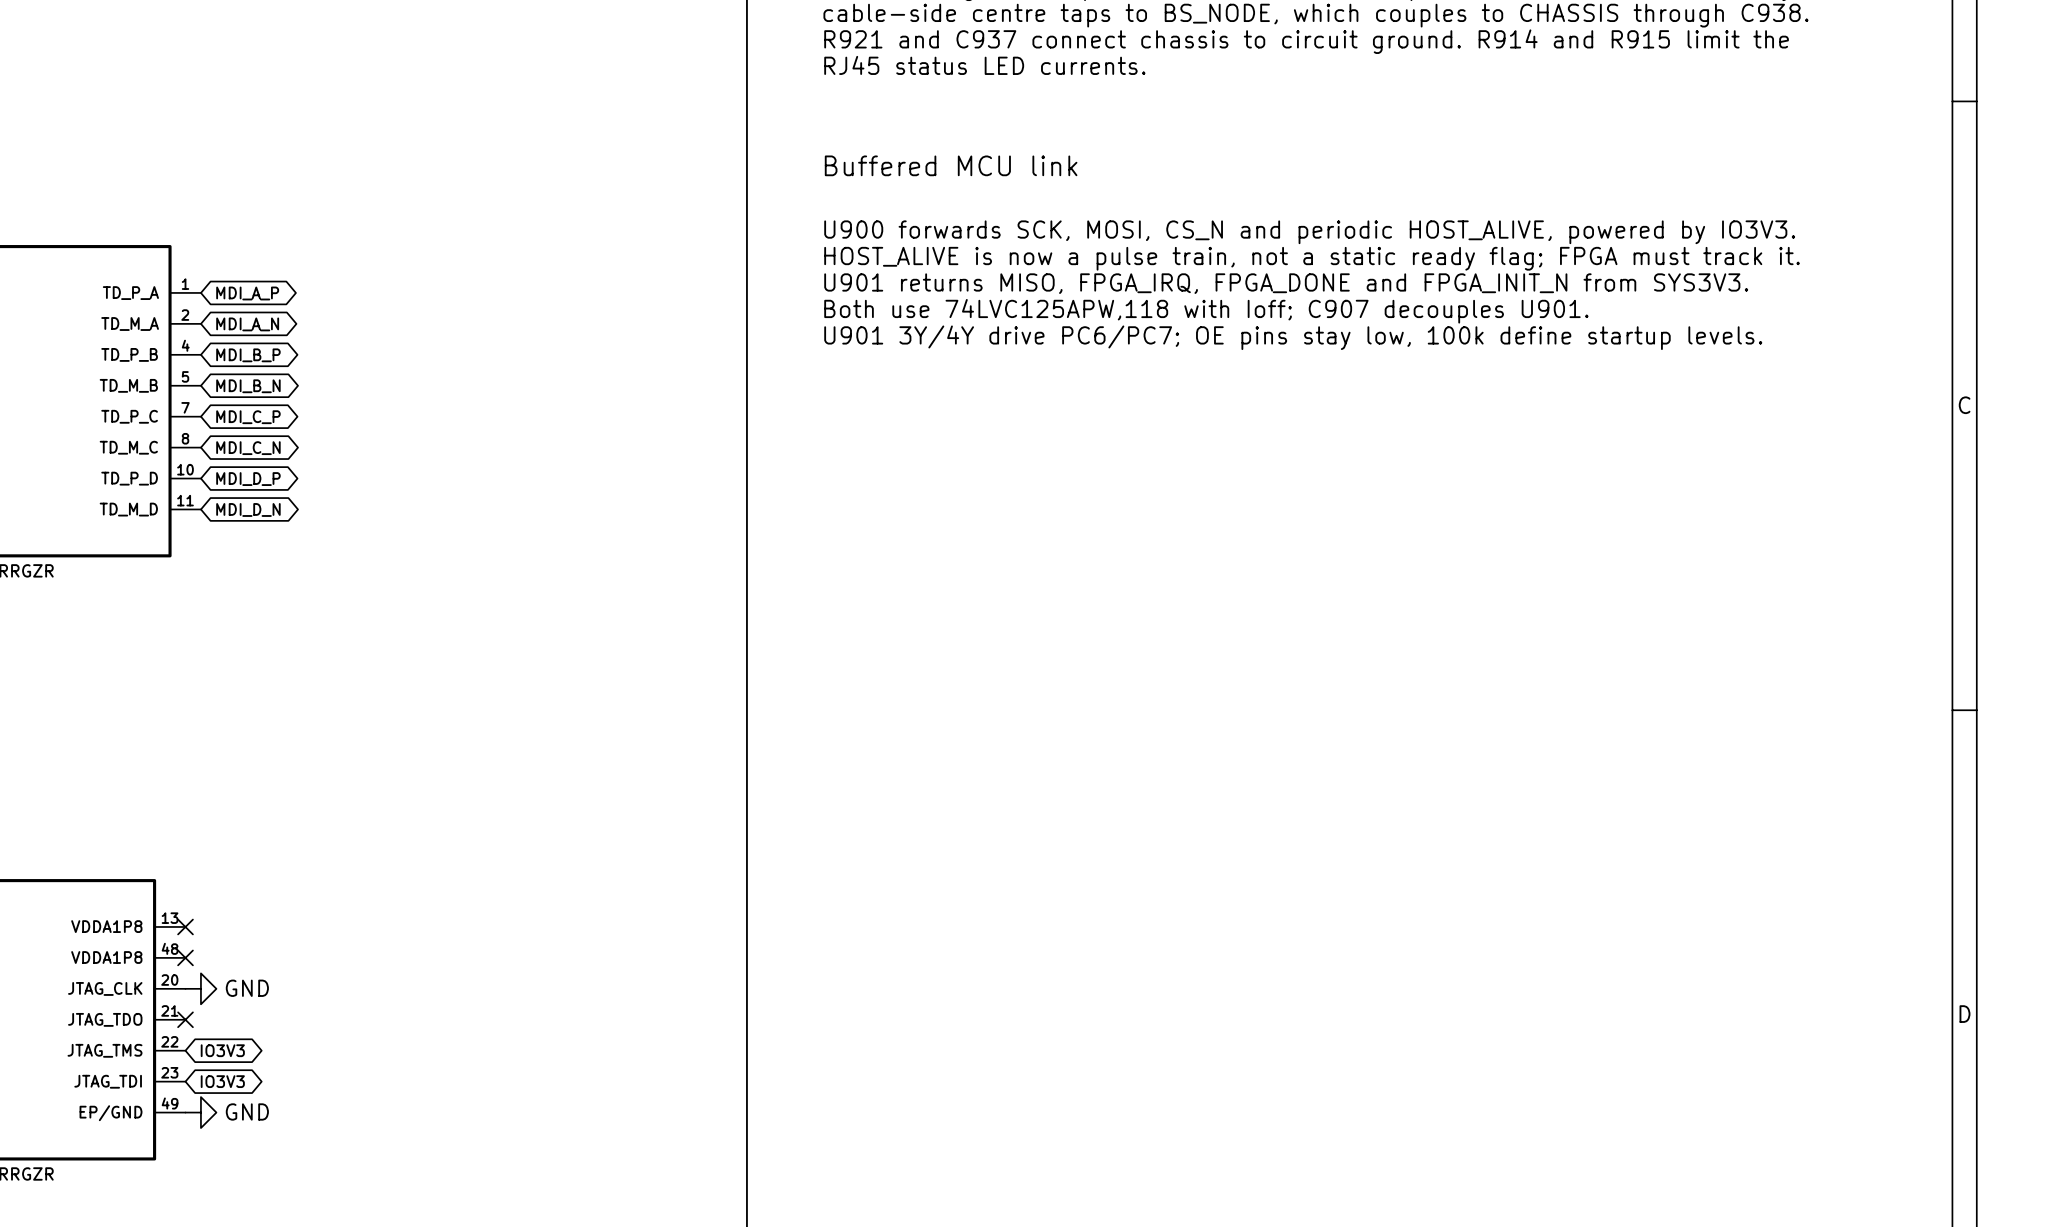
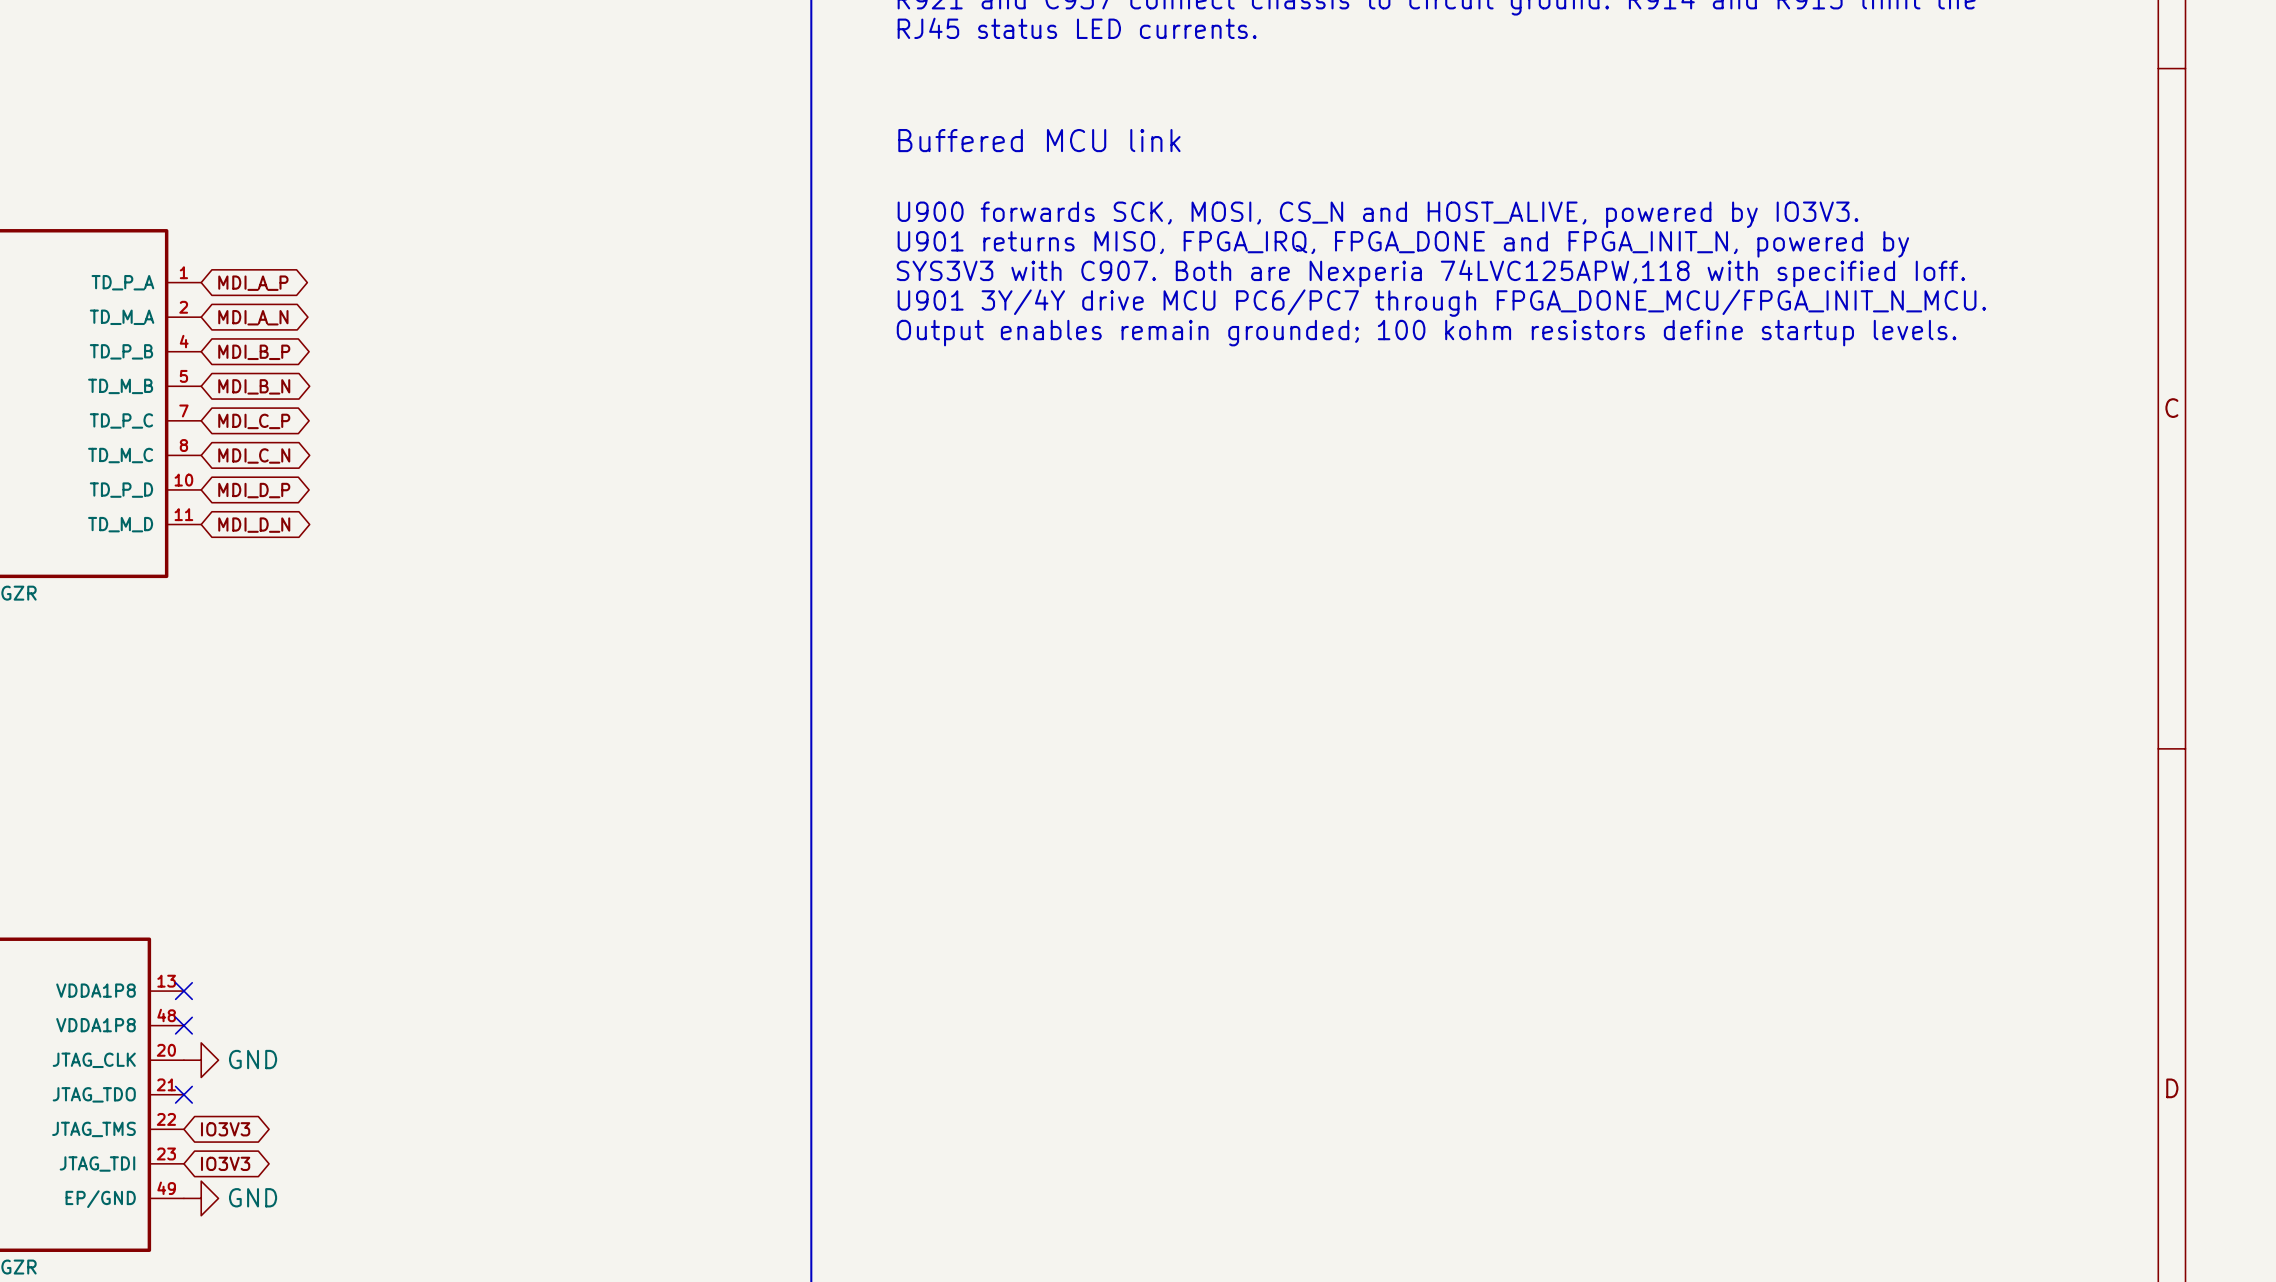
text: U900 forwards SCK, MOSI, CS_N and periodic HOST_ALIVE, powered by IO3V3. (1309, 232) -> U900 forwards SCK, MOSI, CS_N and HOST_ALIVE, powered by IO3V3. (1377, 214)
text: HOST_ALIVE is now a pulse train, not a static ready flag; FPGA must track it. (1312, 258) -> U901 returns MISO, FPGA_IRQ, FPGA_DONE and FPGA_INIT_N, powered by (1403, 244)
text: U901 returns MISO, FPGA_IRQ, FPGA_DONE and FPGA_INIT_N from SYS3V3. (1286, 283) -> SYS3V3 with C907. Both are Nexperia 74LVC125APW,118 with specified Ioff. (1430, 273)
text: Both use 74LVC125APW,118 with Ioff; C907 decouples U901. (1206, 311) -> U901 3Y/4Y drive MCU PC6/PC7 through FPGA_DONE_MCU/FPGA_INIT_N_MCU. (1441, 303)
text: U901 3Y/4Y drive PC6/PC7; OE pins stay low, 100k define startup levels. (1293, 337) -> Output enables remain grounded; 100 kohm resistors define startup levels. (1426, 333)

